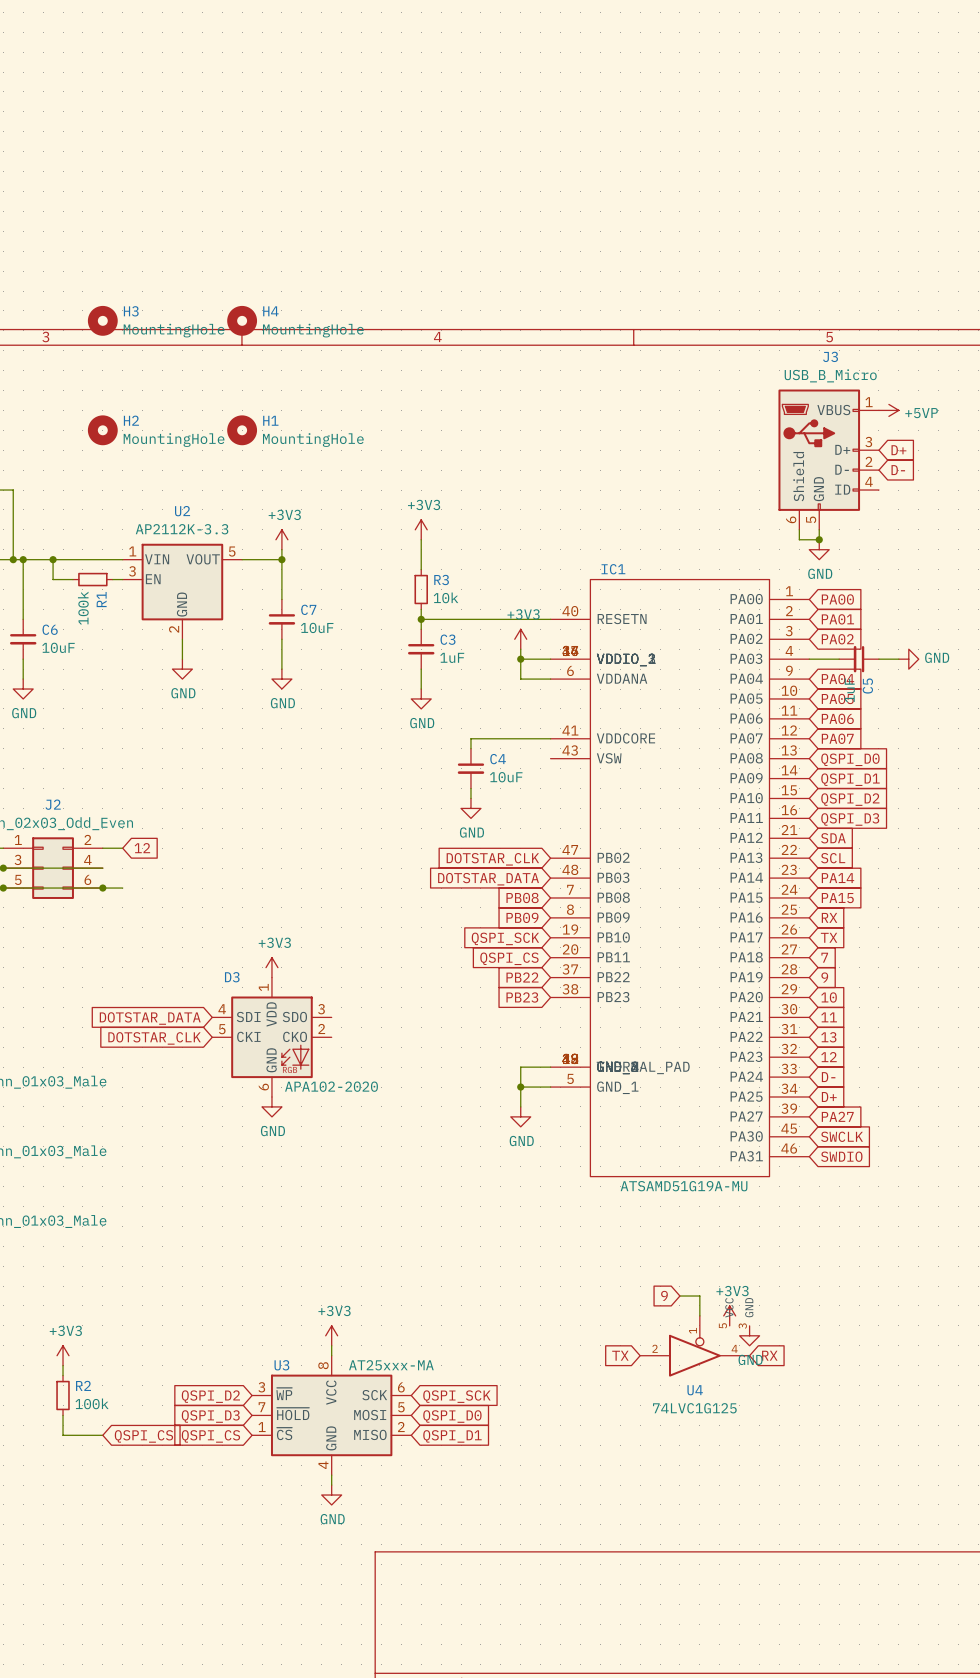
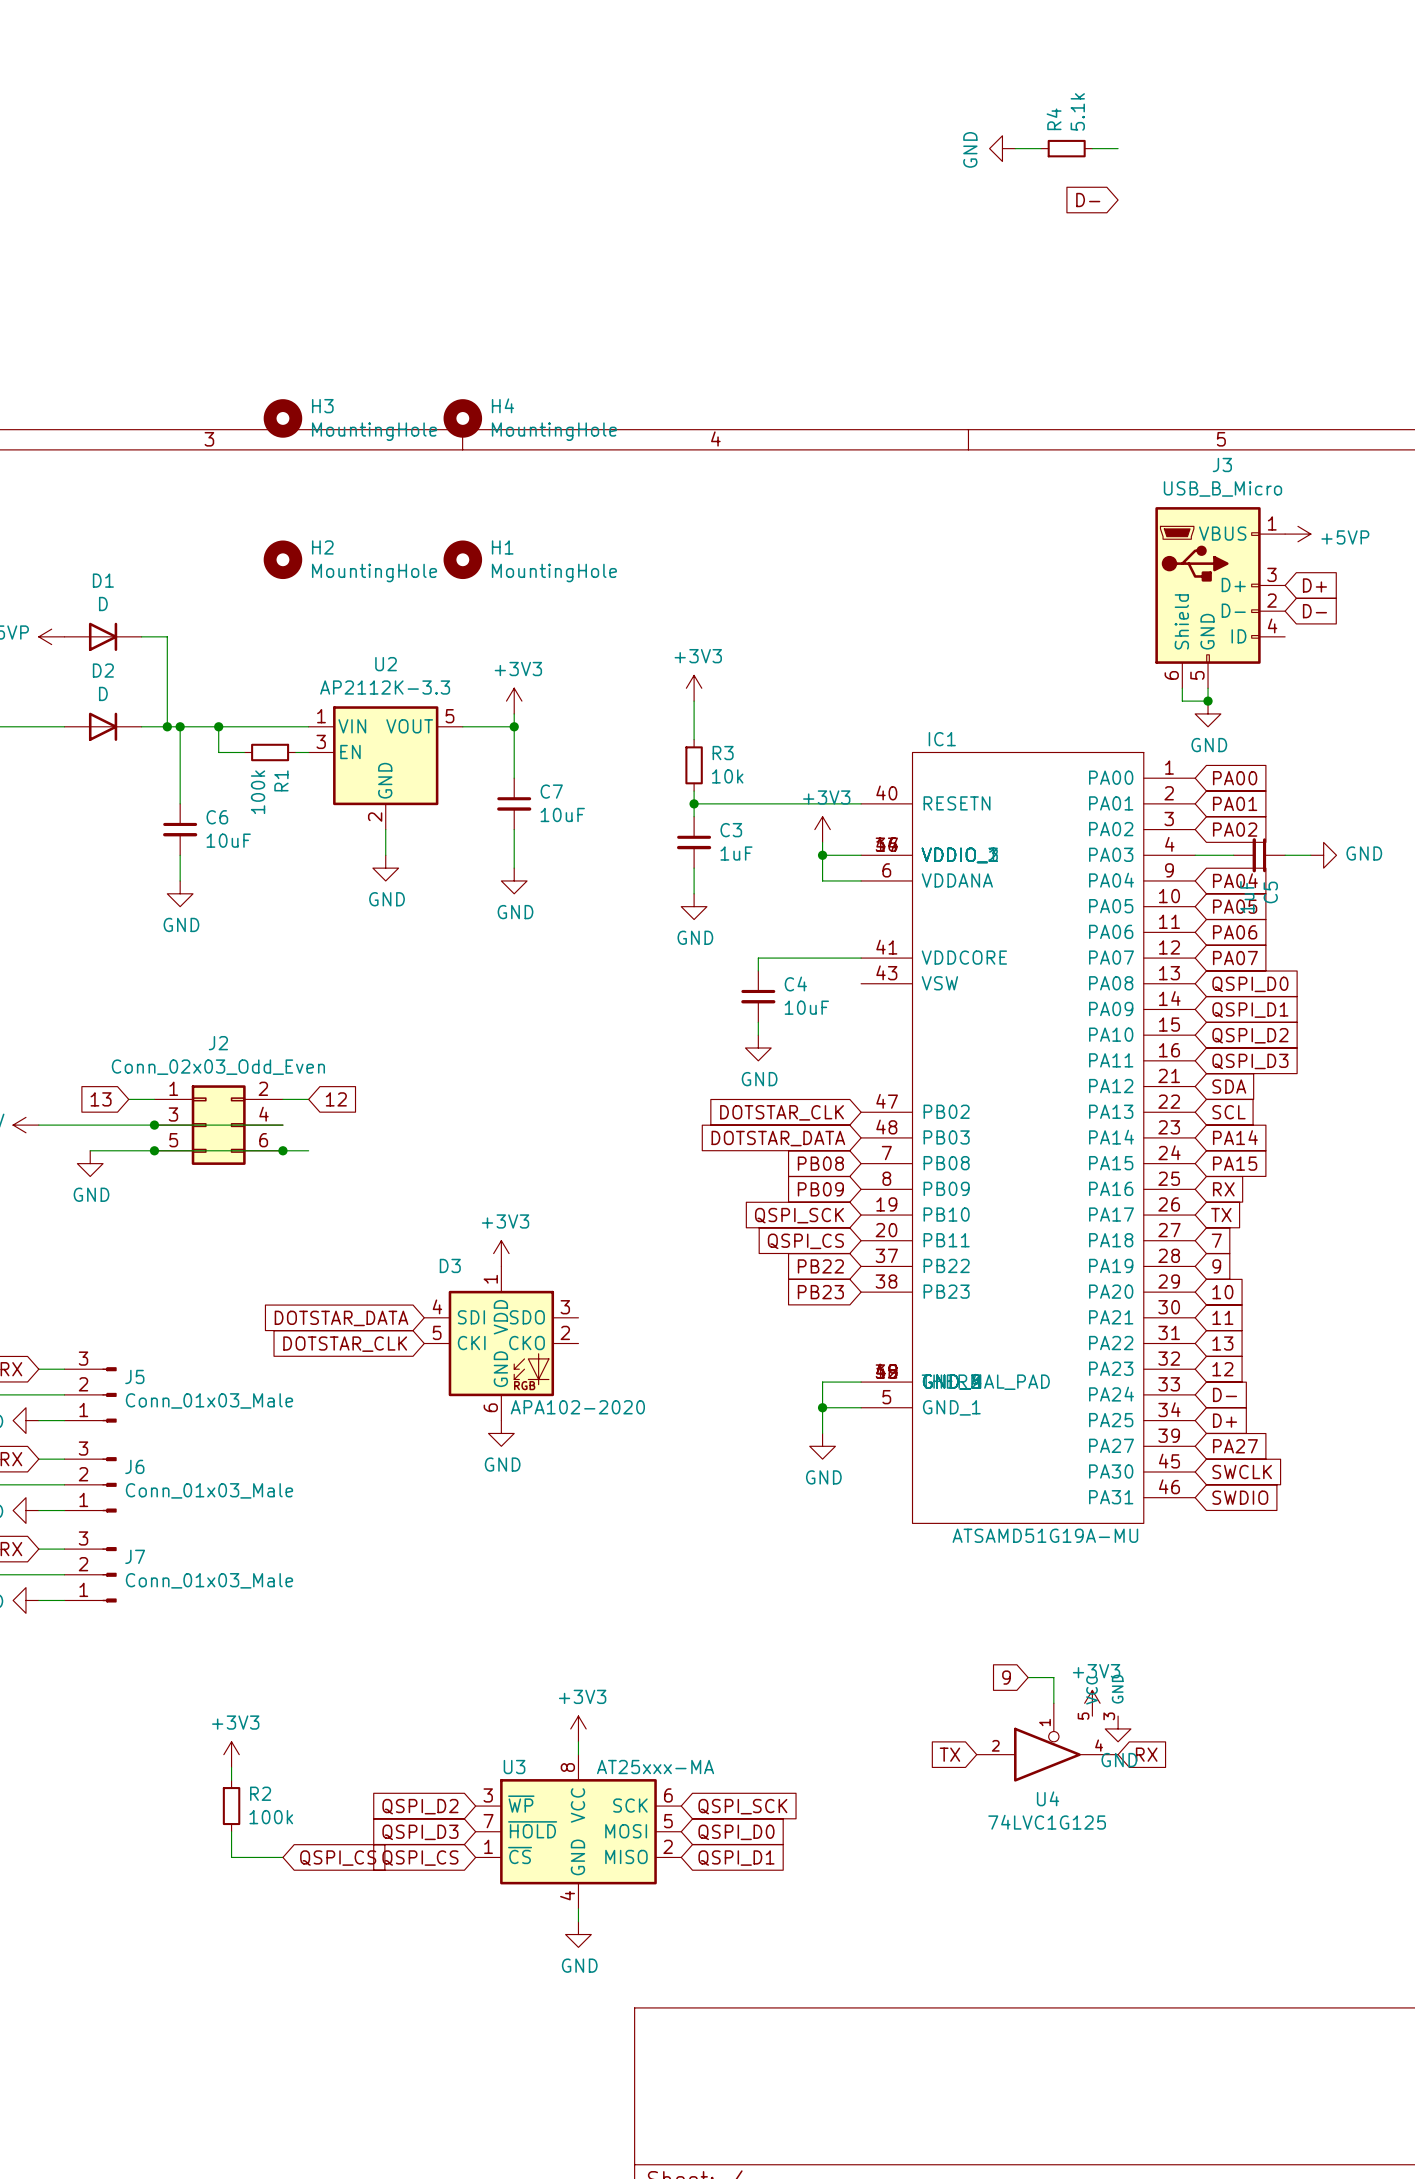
power symbol: none -> GND (1002, 148)
wire: none -> (1015, 148) (1040, 148)
R4: none -> 5.1k (1066, 148)
wire: none -> (1092, 148) (1118, 148)
global label: none -> D- (1088, 200)

